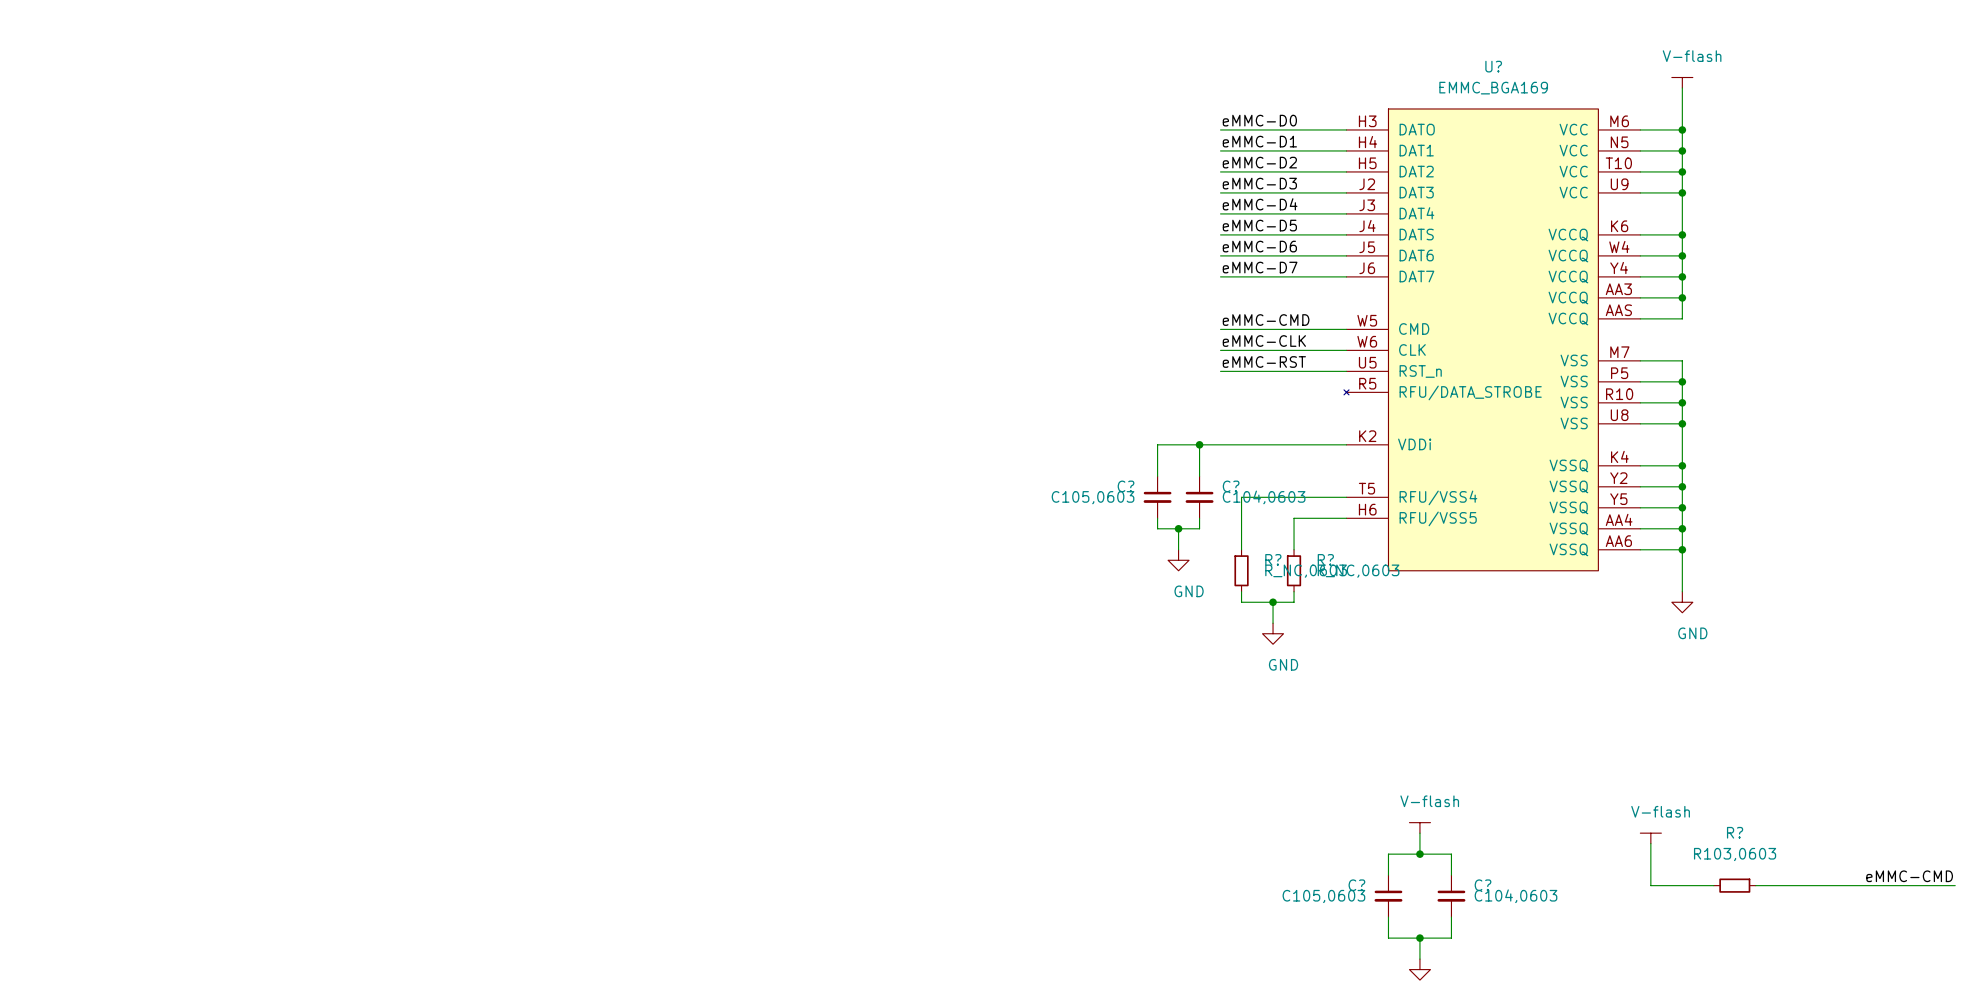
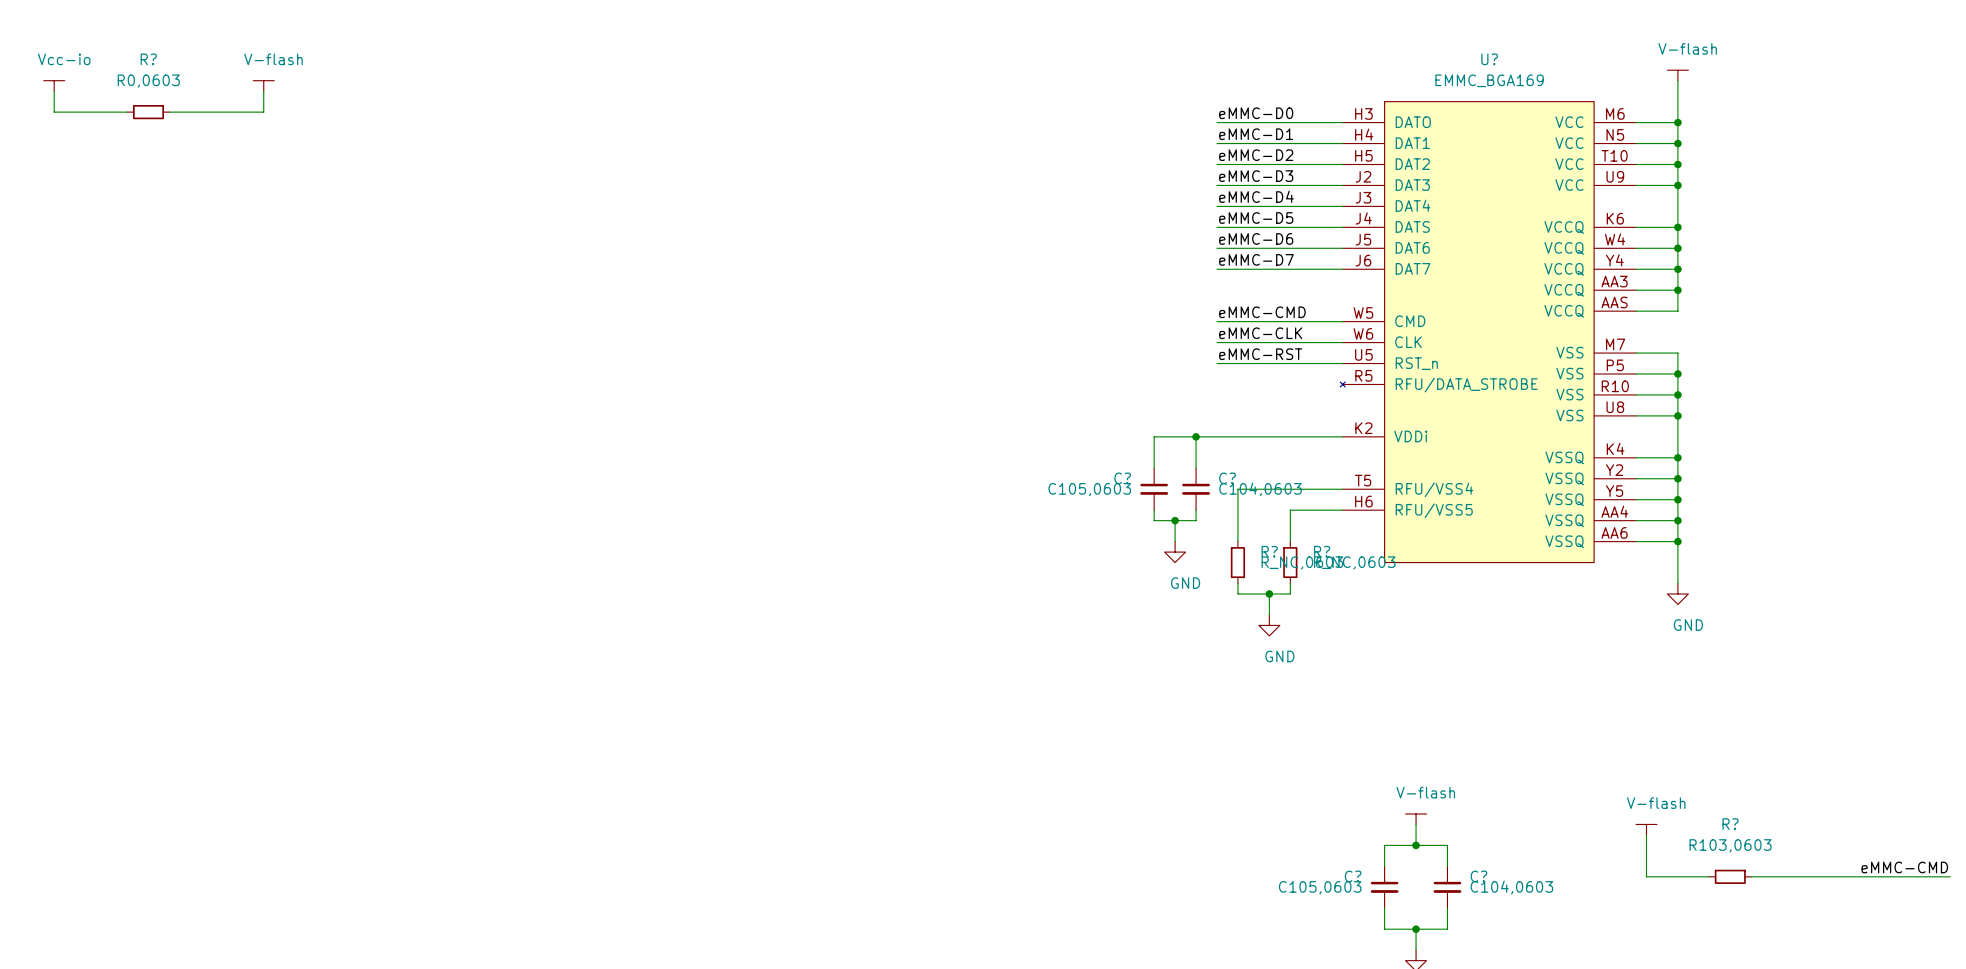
power symbol: none -> Vcc-io (54, 85)
power symbol: none -> V-flash (263, 85)
wire: none -> (54, 91) (54, 112) (127, 112)
wire: none -> (263, 91) (263, 112) (169, 112)
R?: none -> R0,0603 (148, 112)

